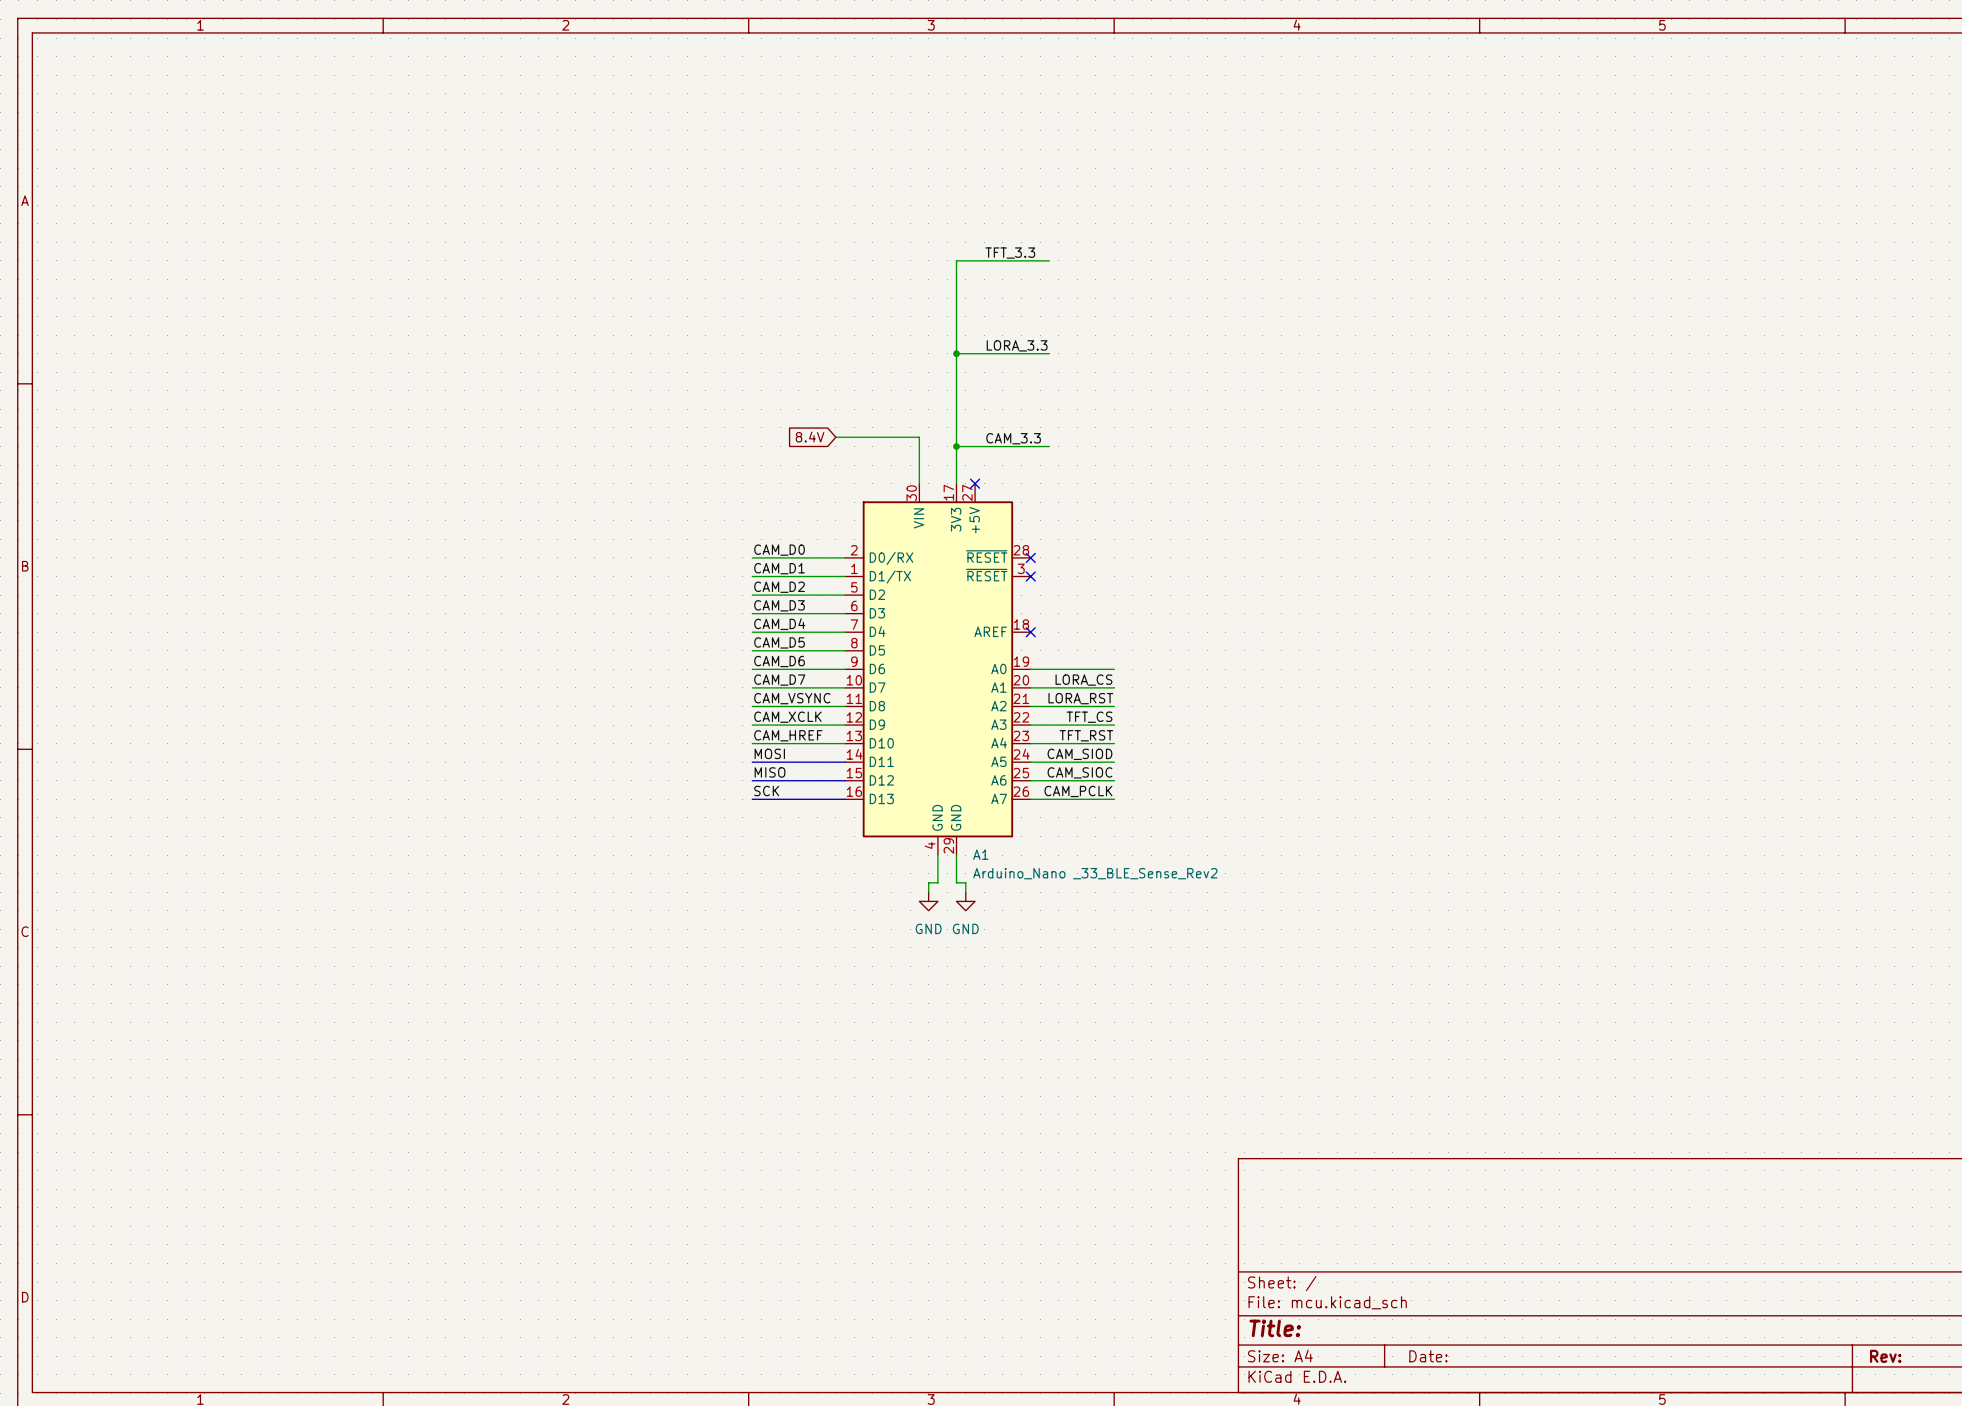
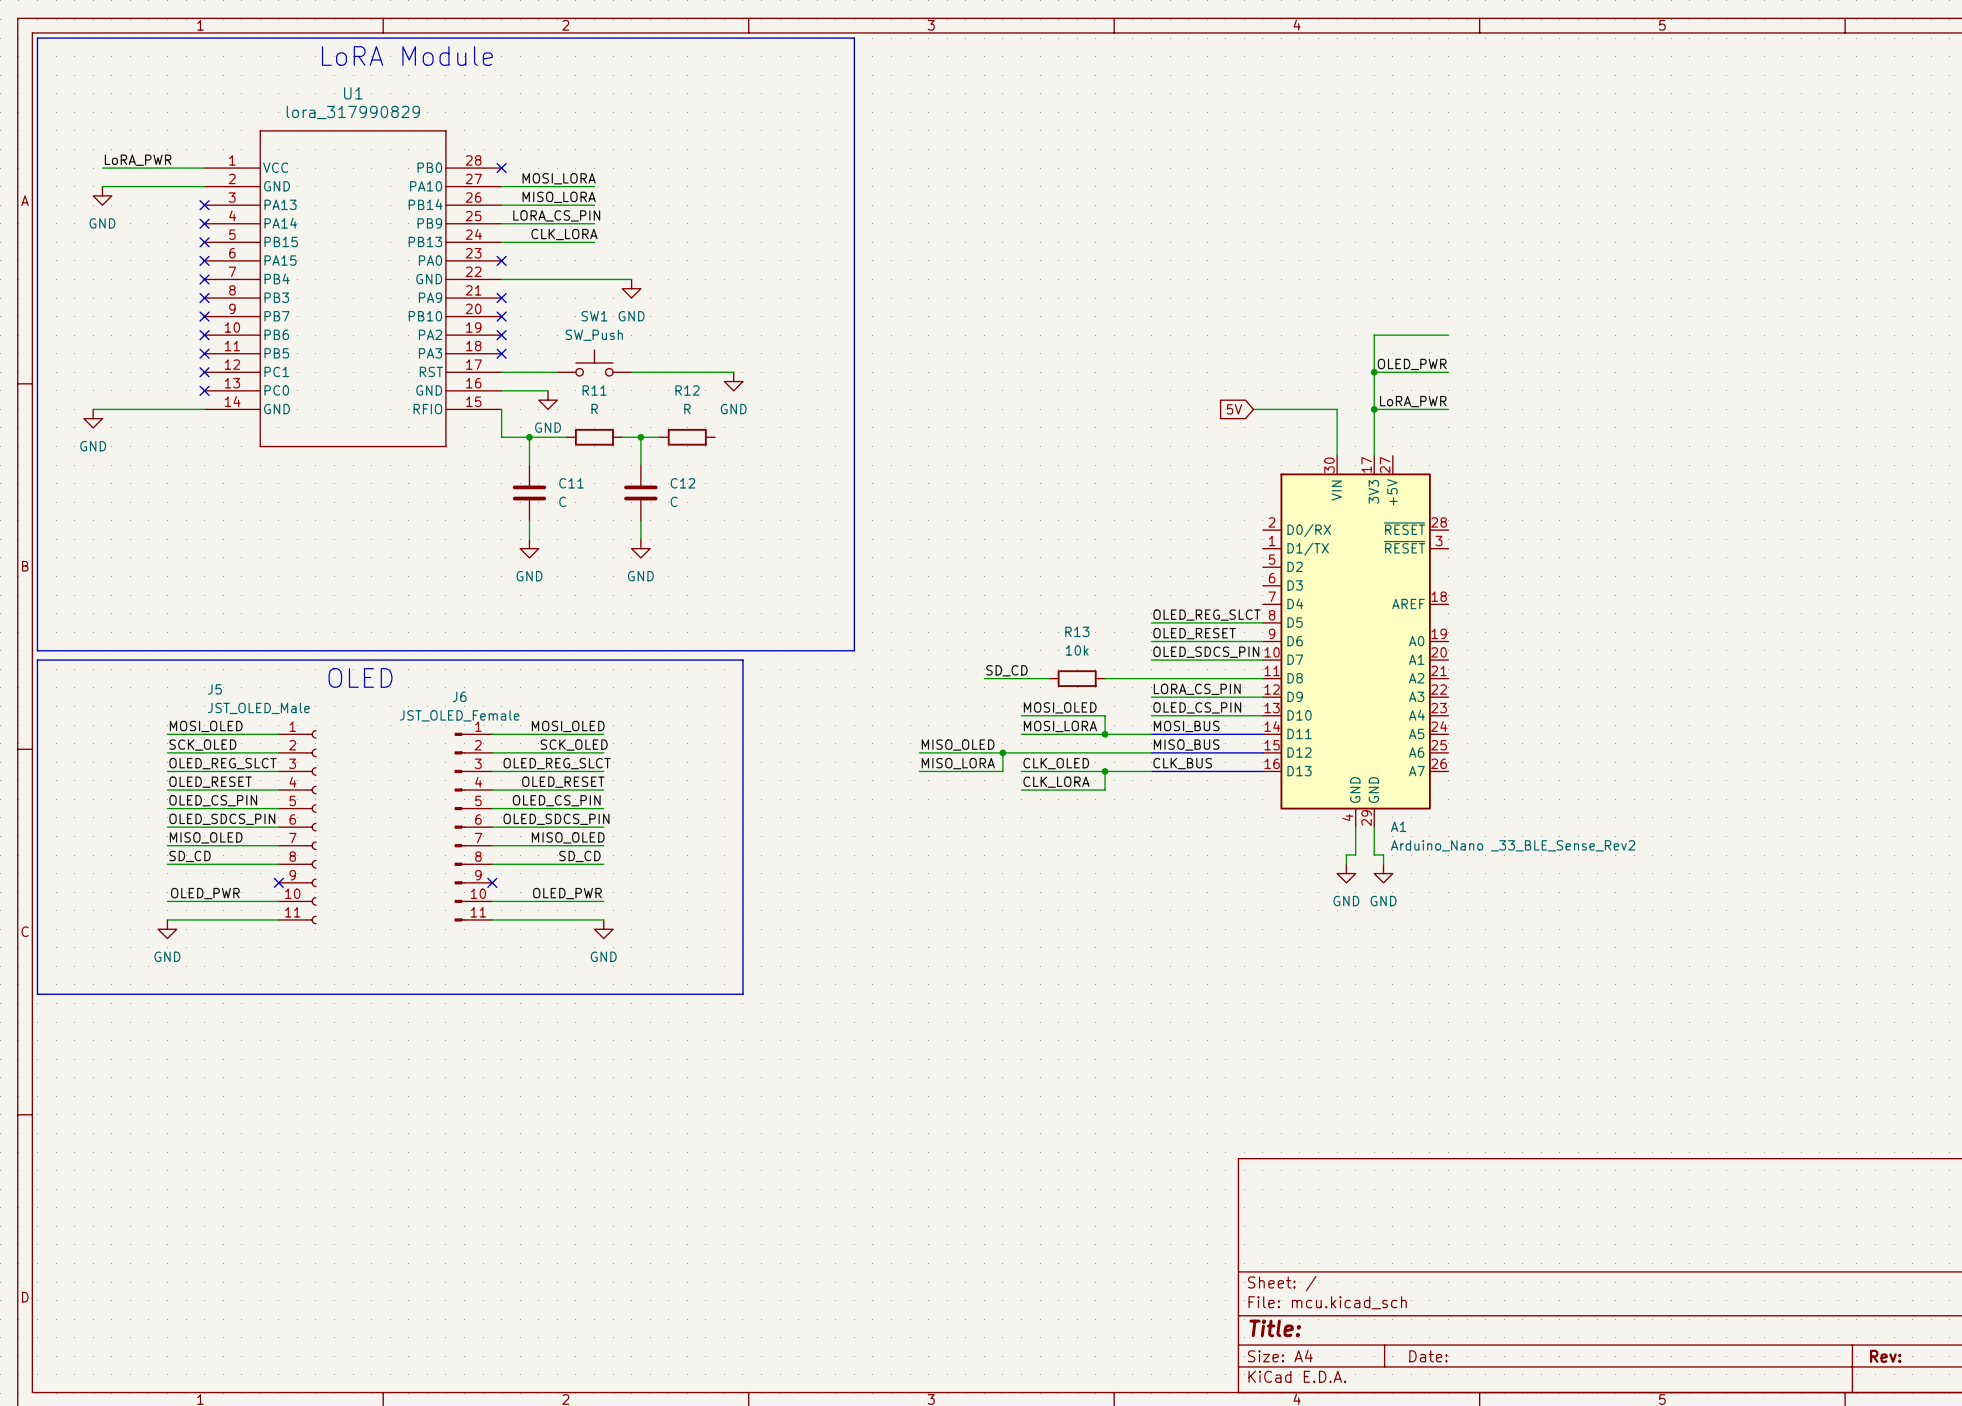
line: none -> (37, 38) (37, 650) (854, 650) (854, 38) (37, 38)
text: none -> LoRA Module (407, 55)
label: none -> LoRA_PWR (138, 160)
wire: none -> (102, 168) (204, 168)
no-connect mark: none -> (501, 168)
label: none -> MOSI_LORA (559, 178)
wire: none -> (102, 186) (204, 186)
wire: none -> (501, 186) (594, 186)
power symbol: none -> GND (102, 195)
label: none -> MISO_LORA (559, 197)
no-connect mark: none -> (204, 205)
wire: none -> (501, 205) (594, 205)
label: none -> LORA_CS_PIN (556, 215)
no-connect mark: none -> (204, 223)
wire: none -> (501, 223) (594, 223)
label: none -> CLK_LORA (564, 234)
no-connect mark: none -> (204, 242)
wire: none -> (501, 242) (594, 242)
label: TFT_3.3 (1010, 253) -> none
no-connect mark: none -> (204, 260)
no-connect mark: none -> (501, 260)
wire: (1049, 260) (956, 260) (956, 483) -> none
no-connect mark: none -> (204, 279)
wire: none -> (501, 279) (631, 279)
U1: none -> lora_317990829 (353, 288)
power symbol: none -> GND (631, 288)
no-connect mark: none -> (204, 298)
no-connect mark: none -> (501, 298)
no-connect mark: none -> (204, 316)
no-connect mark: none -> (501, 316)
no-connect mark: none -> (204, 335)
no-connect mark: none -> (501, 335)
wire: none -> (1448, 335) (1374, 335) (1374, 455)
label: LORA_3.3 (1017, 345) -> none
no-connect mark: none -> (204, 353)
no-connect mark: none -> (501, 353)
wire: (956, 353) (1049, 353) -> none
junction: (956, 353) -> none
SW1: none -> SW_Push (594, 363)
label: none -> OLED_PWR (1412, 364)
no-connect mark: none -> (204, 372)
wire: none -> (501, 372) (557, 372)
wire: none -> (631, 372) (733, 372)
wire: none -> (1374, 372) (1448, 372)
junction: none -> (1374, 372)
power symbol: none -> GND (733, 381)
no-connect mark: none -> (204, 390)
wire: none -> (501, 390) (548, 390)
power symbol: none -> GND (548, 400)
label: none -> LoRA_PWR (1413, 401)
wire: none -> (93, 409) (204, 409)
wire: none -> (501, 409) (501, 437) (566, 437)
global label: none -> 5V (1234, 409)
wire: none -> (1253, 409) (1337, 409) (1337, 455)
wire: none -> (1374, 409) (1448, 409)
junction: none -> (1374, 409)
power symbol: none -> GND (93, 418)
wire: none -> (529, 437) (529, 465)
junction: none -> (529, 437)
R11: none -> R (594, 437)
wire: none -> (622, 437) (659, 437)
wire: none -> (640, 437) (640, 465)
junction: none -> (640, 437)
R12: none -> R (687, 437)
global label: 8.4V (810, 437) -> none
wire: (835, 437) (919, 437) (919, 483) -> none
label: CAM_3.3 (1013, 438) -> none
wire: (956, 446) (1049, 446) -> none
junction: (956, 446) -> none
no-connect mark: (975, 483) -> none
C11: none -> C (529, 492)
C12: none -> C (640, 492)
wire: none -> (529, 520) (529, 539)
wire: none -> (640, 520) (640, 539)
power symbol: none -> GND (529, 548)
power symbol: none -> GND (640, 548)
label: CAM_D0 (779, 550) -> none
wire: (752, 557) (845, 557) -> none
no-connect mark: (1030, 557) -> none
label: CAM_D1 (779, 568) -> none
wire: (752, 576) (845, 576) -> none
no-connect mark: (1030, 576) -> none
label: CAM_D2 (779, 587) -> none
wire: (752, 595) (845, 595) -> none
label: CAM_D3 (779, 605) -> none
wire: (752, 613) (845, 613) -> none
label: none -> OLED_REG_SLCT (1206, 615)
wire: none -> (1151, 622) (1262, 622)
label: CAM_D4 (779, 624) -> none
wire: (752, 632) (845, 632) -> none
no-connect mark: (1030, 632) -> none
label: none -> OLED_RESET (1194, 633)
wire: none -> (1151, 641) (1262, 641)
label: CAM_D5 (779, 642) -> none
label: none -> OLED_SDCS_PIN (1206, 652)
line: none -> (37, 660) (742, 660) (742, 994) (37, 994) (37, 660)
wire: none -> (1151, 660) (1262, 660)
label: CAM_D6 (779, 661) -> none
wire: (752, 669) (845, 669) -> none
A1 position: (937, 669) -> (1355, 641)
wire: (1030, 669) (1114, 669) -> none
label: none -> SD_CD (1006, 670)
text: none -> OLED (360, 677)
wire: none -> (984, 678) (1049, 678)
R13: none -> 10k (1077, 678)
wire: none -> (1105, 678) (1262, 678)
label: CAM_D7 (779, 680) -> none
label: LORA_CS (1083, 680) -> none
wire: (752, 687) (845, 687) -> none
wire: (1030, 687) (1114, 687) -> none
label: none -> LORA_CS_PIN (1197, 689)
wire: none -> (1151, 697) (1262, 697)
label: CAM_VSYNC (792, 698) -> none
label: LORA_RST (1080, 698) -> none
wire: (752, 706) (845, 706) -> none
wire: (1030, 706) (1114, 706) -> none
label: none -> MOSI_OLED (1060, 707)
label: none -> OLED_CS_PIN (1197, 707)
wire: none -> (1021, 715) (1105, 715) (1105, 734)
wire: none -> (1151, 715) (1262, 715)
label: CAM_XCLK (787, 717) -> none
label: TFT_CS (1089, 717) -> none
wire: (752, 725) (845, 725) -> none
wire: (1030, 725) (1114, 725) -> none
label: none -> MOSI_OLED (206, 726)
label: none -> MOSI_OLED (568, 726)
label: none -> MOSI_LORA (1060, 726)
label: none -> MOSI_BUS (1186, 726)
wire: none -> (167, 734) (278, 734)
wire: none -> (492, 734) (603, 734)
wire: none -> (1021, 734) (1151, 734)
junction: none -> (1105, 734)
bus: none -> (1151, 734) (1262, 734)
label: CAM_HREF (788, 735) -> none
label: TFT_RST (1086, 735) -> none
wire: (752, 743) (845, 743) -> none
wire: (1030, 743) (1114, 743) -> none
label: none -> SCK_OLED (202, 745)
label: none -> SCK_OLED (574, 745)
label: none -> MISO_OLED (958, 745)
label: none -> MISO_BUS (1186, 745)
wire: none -> (167, 752) (278, 752)
wire: none -> (492, 752) (603, 752)
wire: none -> (919, 752) (1151, 752)
junction: none -> (1002, 752)
bus: none -> (1151, 752) (1262, 752)
label: MOSI (769, 753) -> none
label: CAM_SIOD (1079, 754) -> none
bus: (752, 762) (845, 762) -> none
wire: (1030, 762) (1114, 762) -> none
label: none -> OLED_REG_SLCT (222, 763)
label: none -> OLED_REG_SLCT (557, 763)
label: none -> MISO_LORA (958, 763)
label: none -> CLK_OLED (1056, 763)
label: none -> CLK_BUS (1182, 763)
wire: none -> (167, 771) (278, 771)
wire: none -> (492, 771) (603, 771)
wire: none -> (1021, 771) (1151, 771)
wire: none -> (1105, 771) (1105, 790) (1021, 790)
junction: none -> (1105, 771)
bus: none -> (1151, 771) (1262, 771)
label: MISO (770, 772) -> none
label: CAM_SIOC (1079, 772) -> none
bus: (752, 780) (845, 780) -> none
wire: (1030, 780) (1114, 780) -> none
label: none -> OLED_RESET (210, 782)
label: none -> OLED_RESET (563, 782)
label: none -> CLK_LORA (1056, 782)
wire: none -> (167, 790) (278, 790)
wire: none -> (492, 790) (603, 790)
label: SCK (766, 791) -> none
label: CAM_PCLK (1078, 791) -> none
bus: (752, 799) (845, 799) -> none
wire: (1030, 799) (1114, 799) -> none
label: none -> OLED_CS_PIN (213, 800)
label: none -> OLED_CS_PIN (556, 800)
wire: none -> (167, 808) (278, 808)
wire: none -> (492, 808) (603, 808)
label: none -> OLED_SDCS_PIN (222, 819)
label: none -> OLED_SDCS_PIN (556, 819)
wire: none -> (167, 827) (278, 827)
J5: none -> JST_OLED_Male (297, 827)
J6: none -> JST_OLED_Female (473, 827)
wire: none -> (492, 827) (603, 827)
wire: none -> (1355, 827) (1355, 855) (1346, 855) (1346, 864)
wire: none -> (1374, 827) (1374, 855) (1383, 855) (1383, 864)
label: none -> MISO_OLED (206, 837)
label: none -> MISO_OLED (568, 837)
wire: none -> (167, 845) (278, 845)
wire: none -> (492, 845) (603, 845)
wire: (937, 855) (937, 882) (928, 882) (928, 892) -> none
wire: (956, 855) (956, 882) (965, 882) (965, 892) -> none
label: none -> SD_CD (190, 856)
label: none -> SD_CD (579, 856)
wire: none -> (167, 864) (278, 864)
wire: none -> (492, 864) (603, 864)
power symbol: none -> GND (1346, 873)
power symbol: none -> GND (1383, 873)
no-connect mark: none -> (278, 882)
no-connect mark: none -> (492, 882)
label: none -> OLED_PWR (205, 893)
label: none -> OLED_PWR (567, 893)
wire: none -> (167, 901) (278, 901)
wire: none -> (492, 901) (603, 901)
power symbol: GND (928, 901) -> none
power symbol: GND (965, 901) -> none
wire: none -> (167, 919) (278, 919)
wire: none -> (492, 919) (603, 919)
power symbol: none -> GND (167, 929)
power symbol: none -> GND (603, 929)

